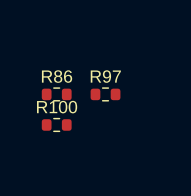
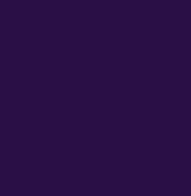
R86: (56, 94) -> none
R97: (105, 94) -> none
R100: (56, 124) -> none

